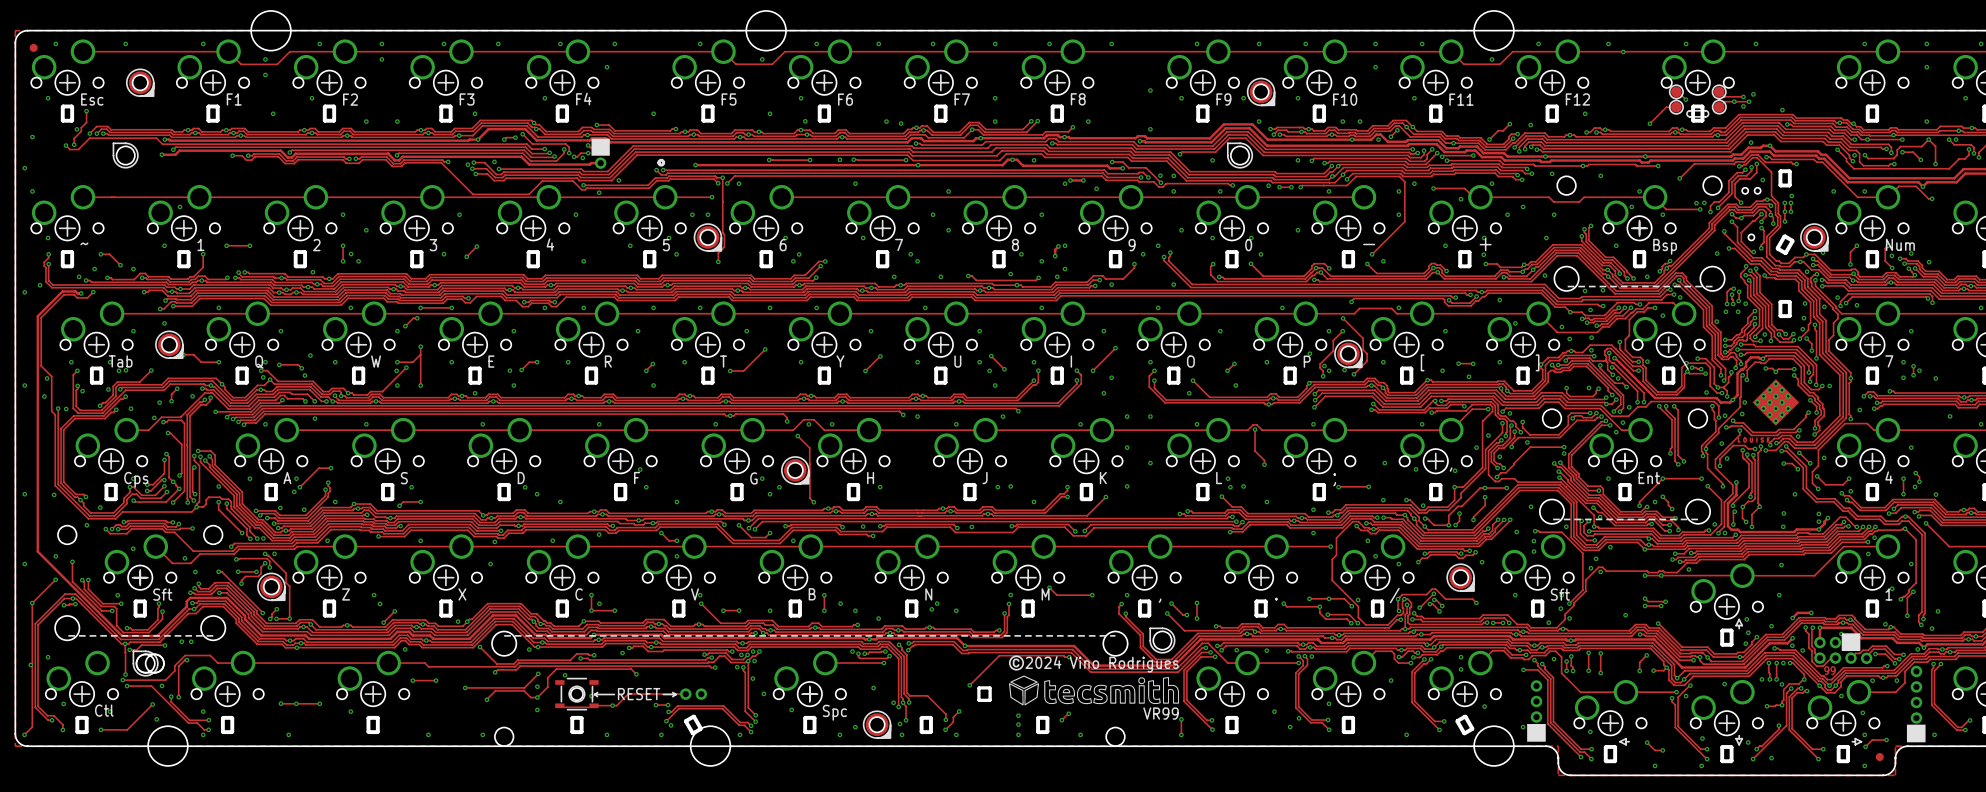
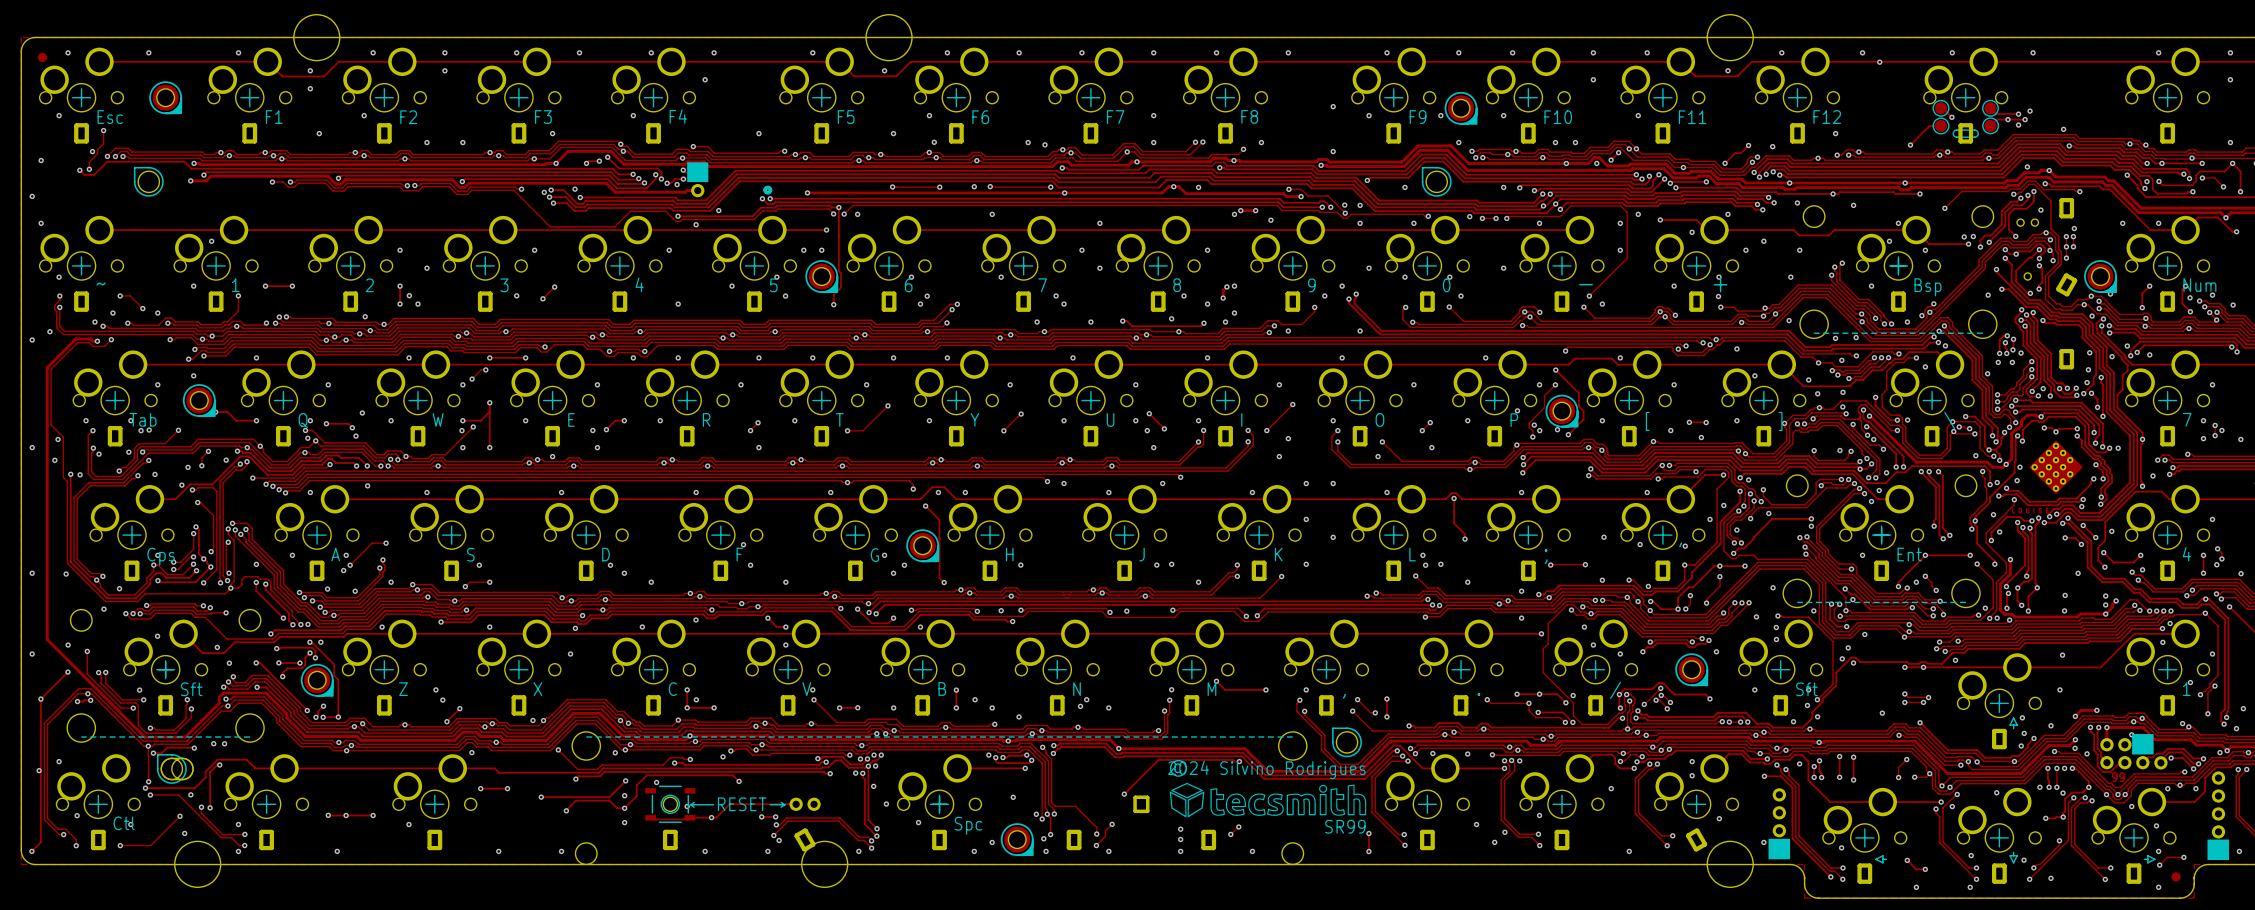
text: 2024 Vino Rodrigues (1102, 664) -> 2024 Silvino Rodrigues (1266, 769)
text: VR99 (1161, 713) -> SR99 (1345, 826)

